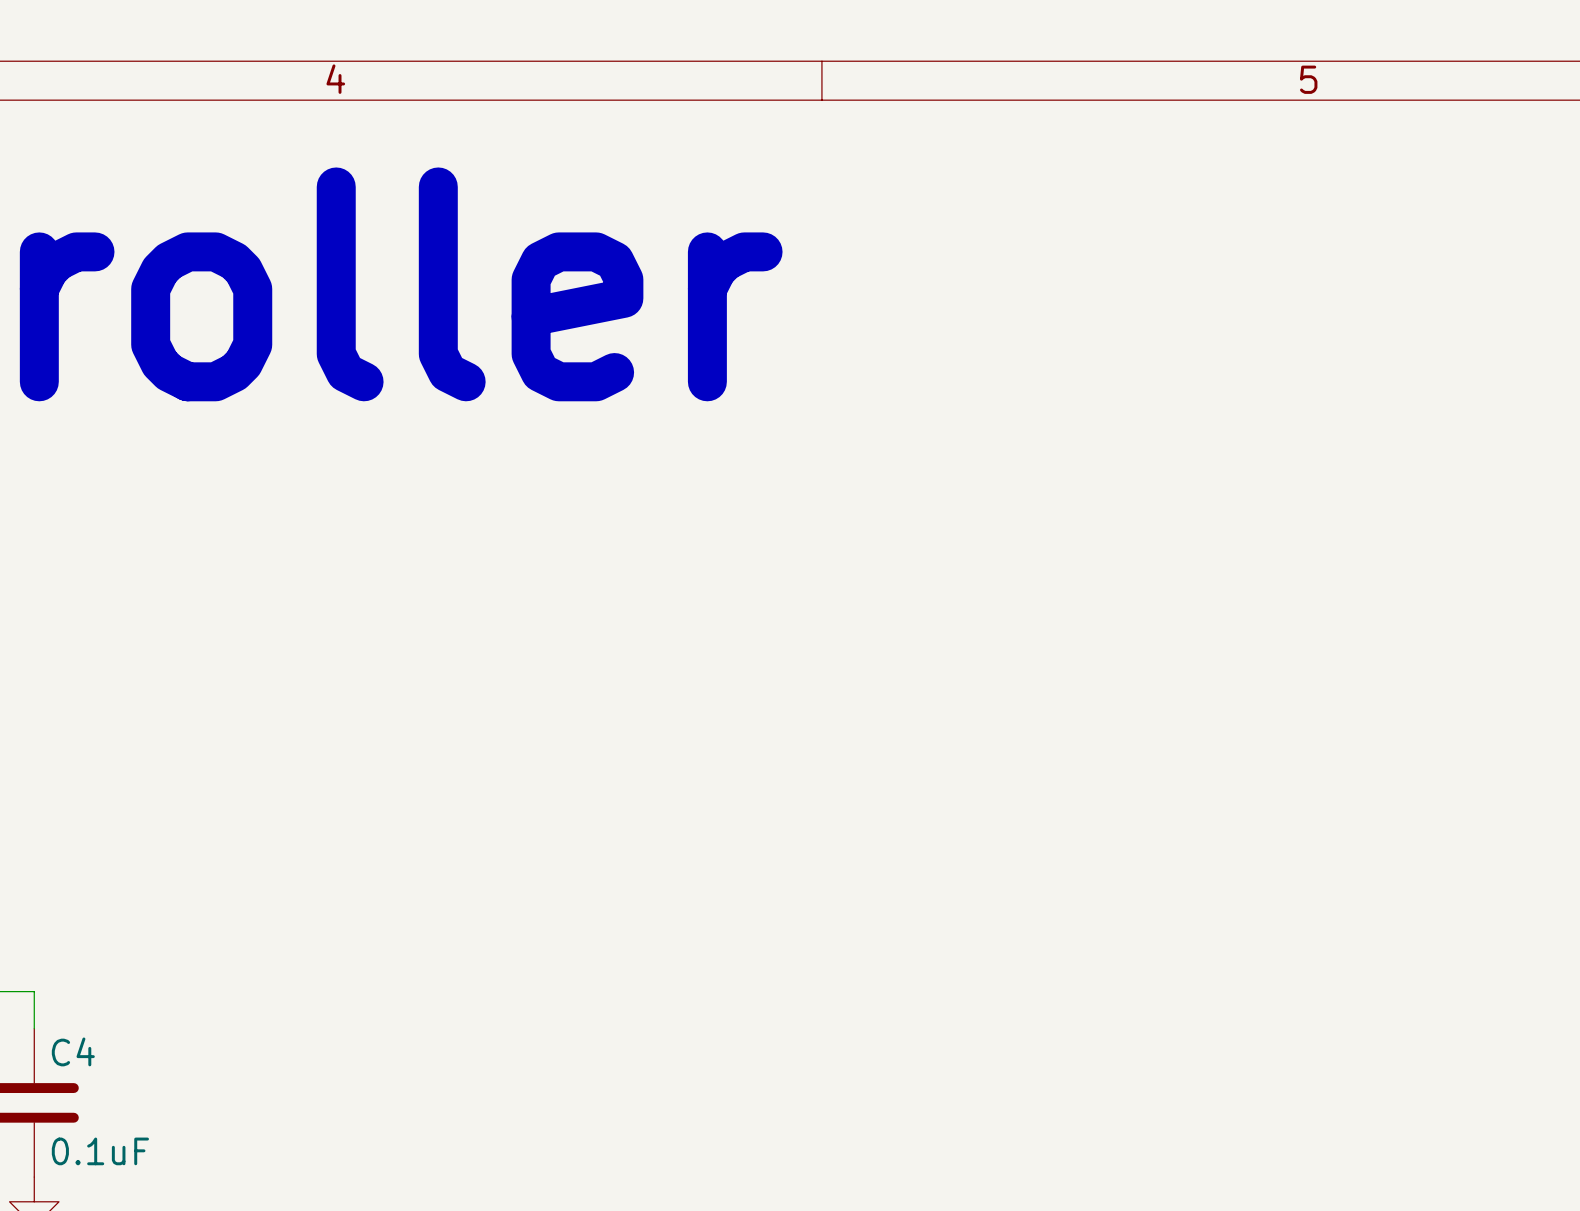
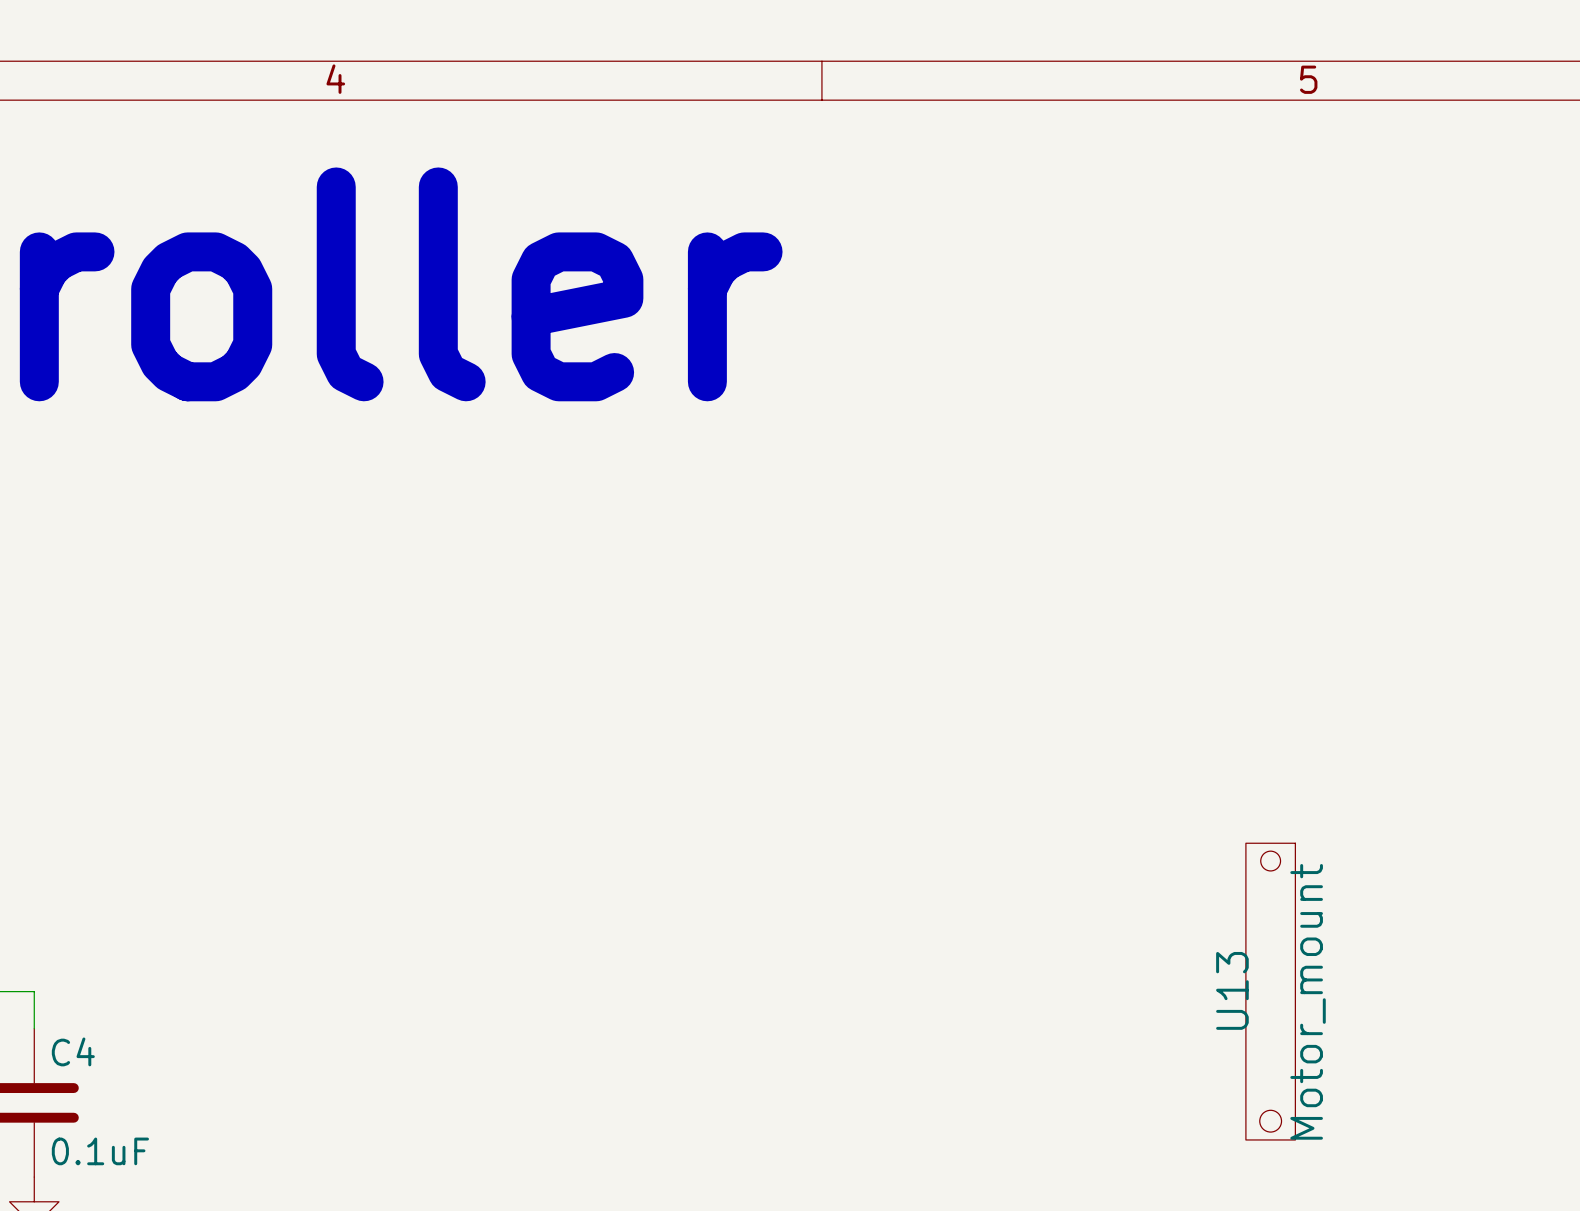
U13: none -> Motor_mount (1270, 991)

